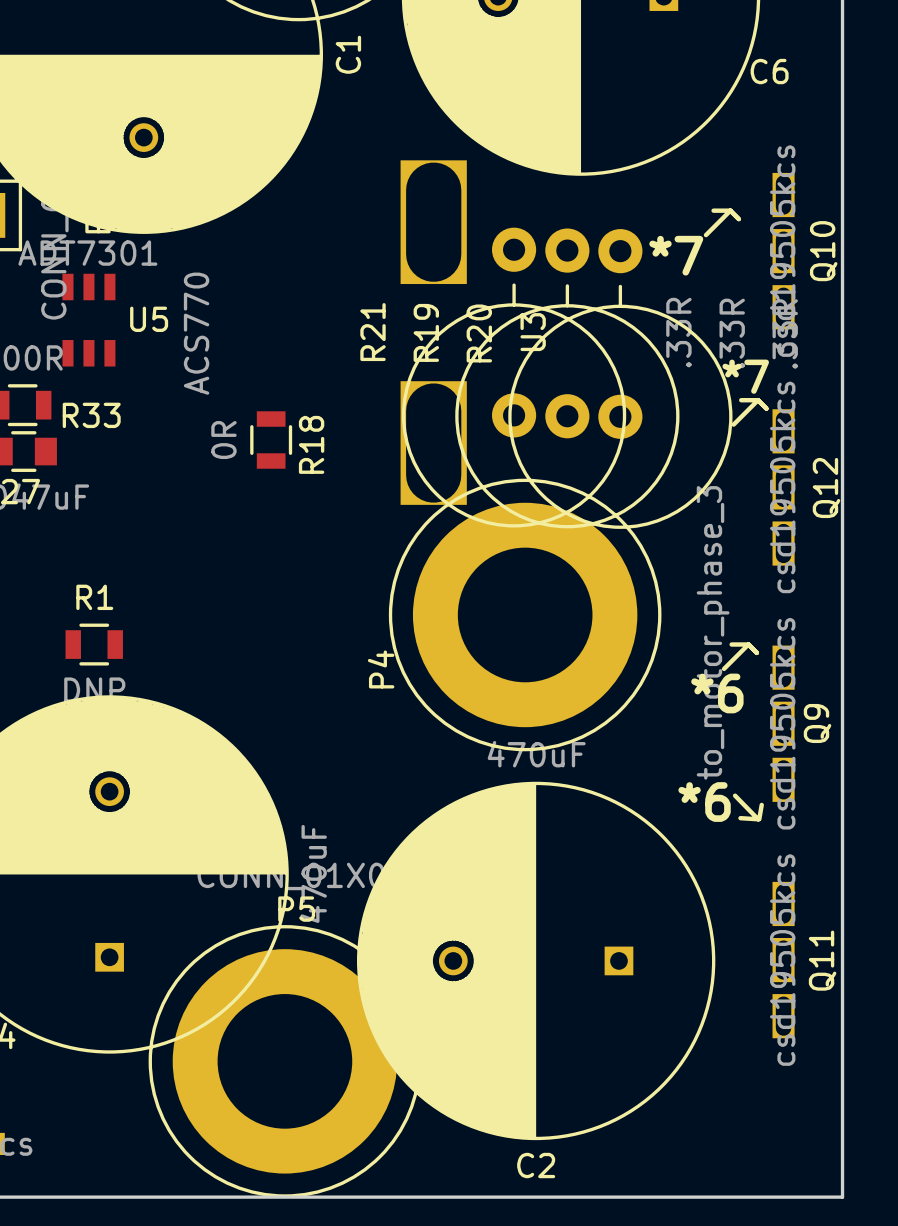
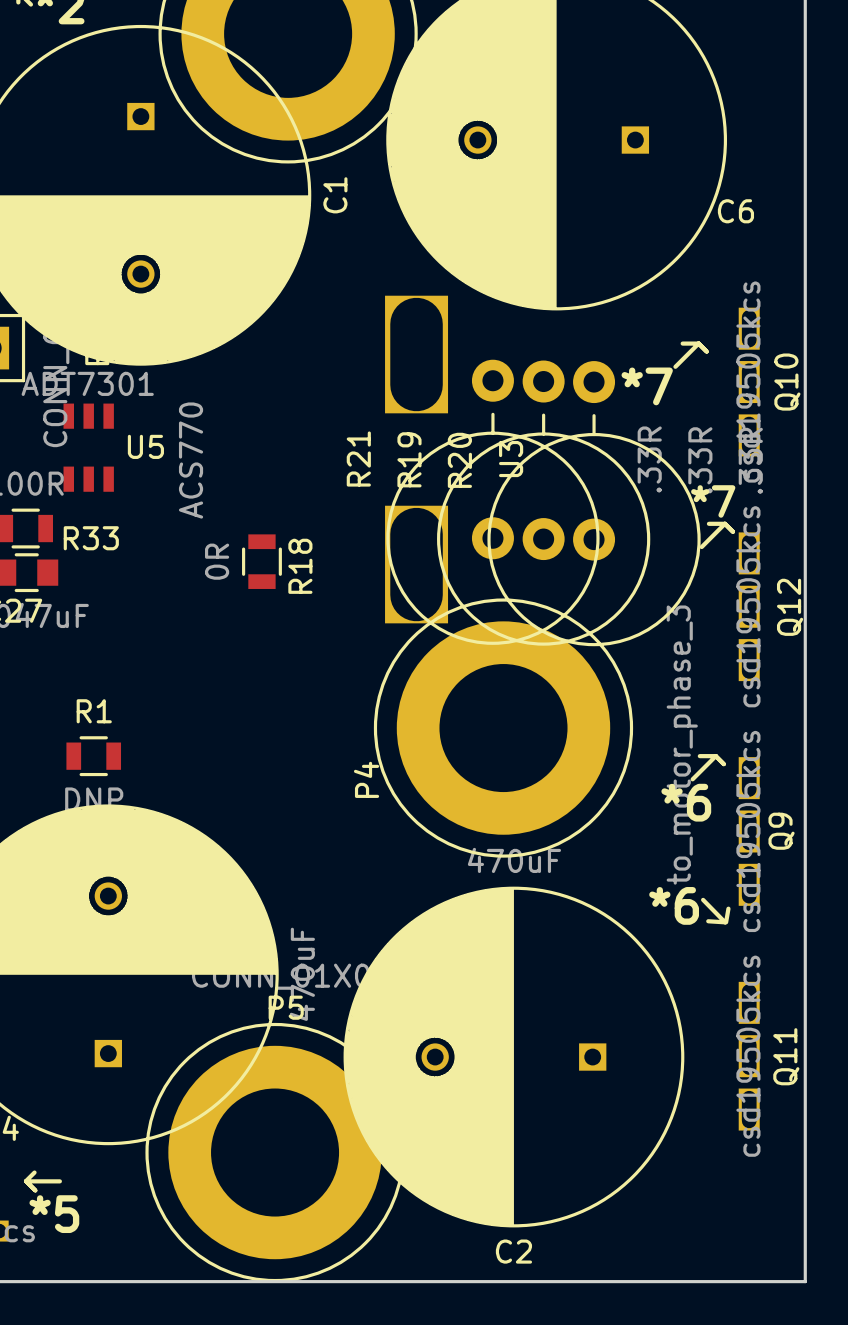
line: none -> (34, 1172) (26, 1181) (35, 1190)
line: none -> (26, 1181) (59, 1181)
text: none -> *5 (54, 1214)

